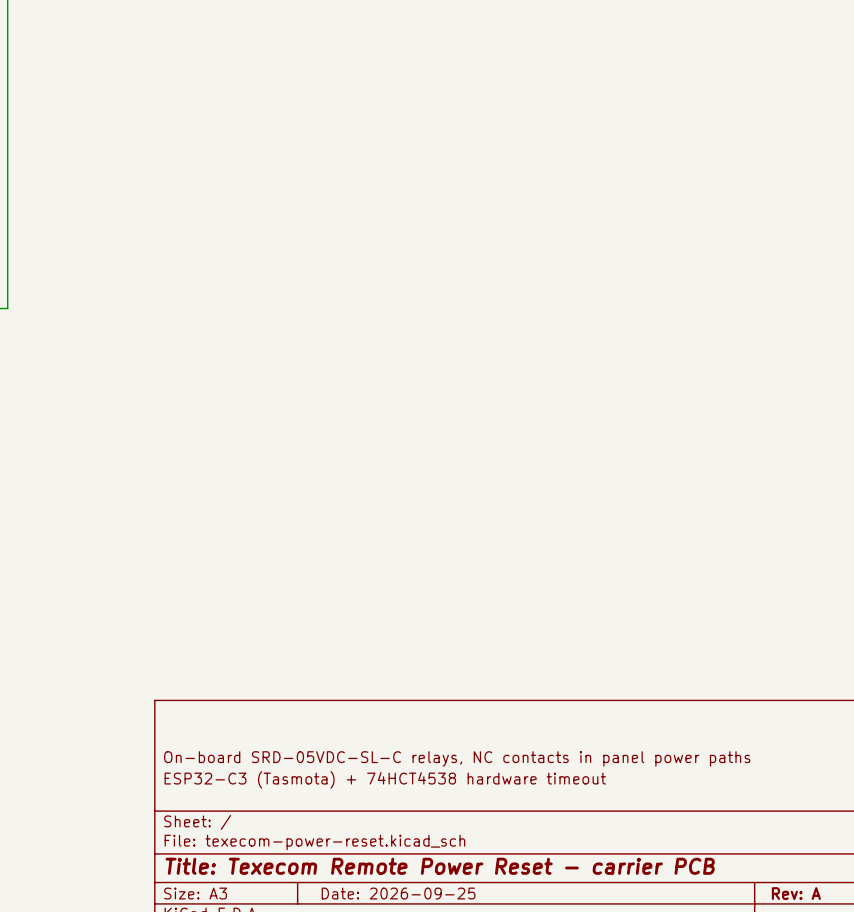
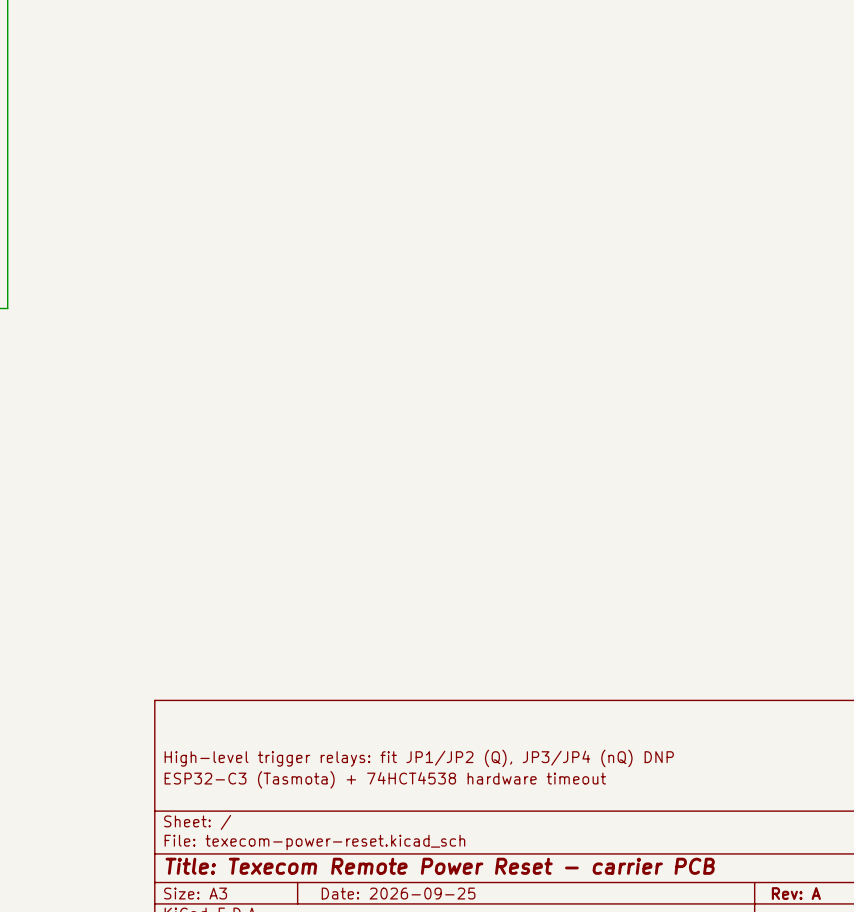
title block: On-board SRD-05VDC-SL-C relays, NC contacts in panel power paths (457, 758) -> High-level trigger relays: fit JP1/JP2 (Q), JP3/JP4 (nQ) DNP (419, 758)

